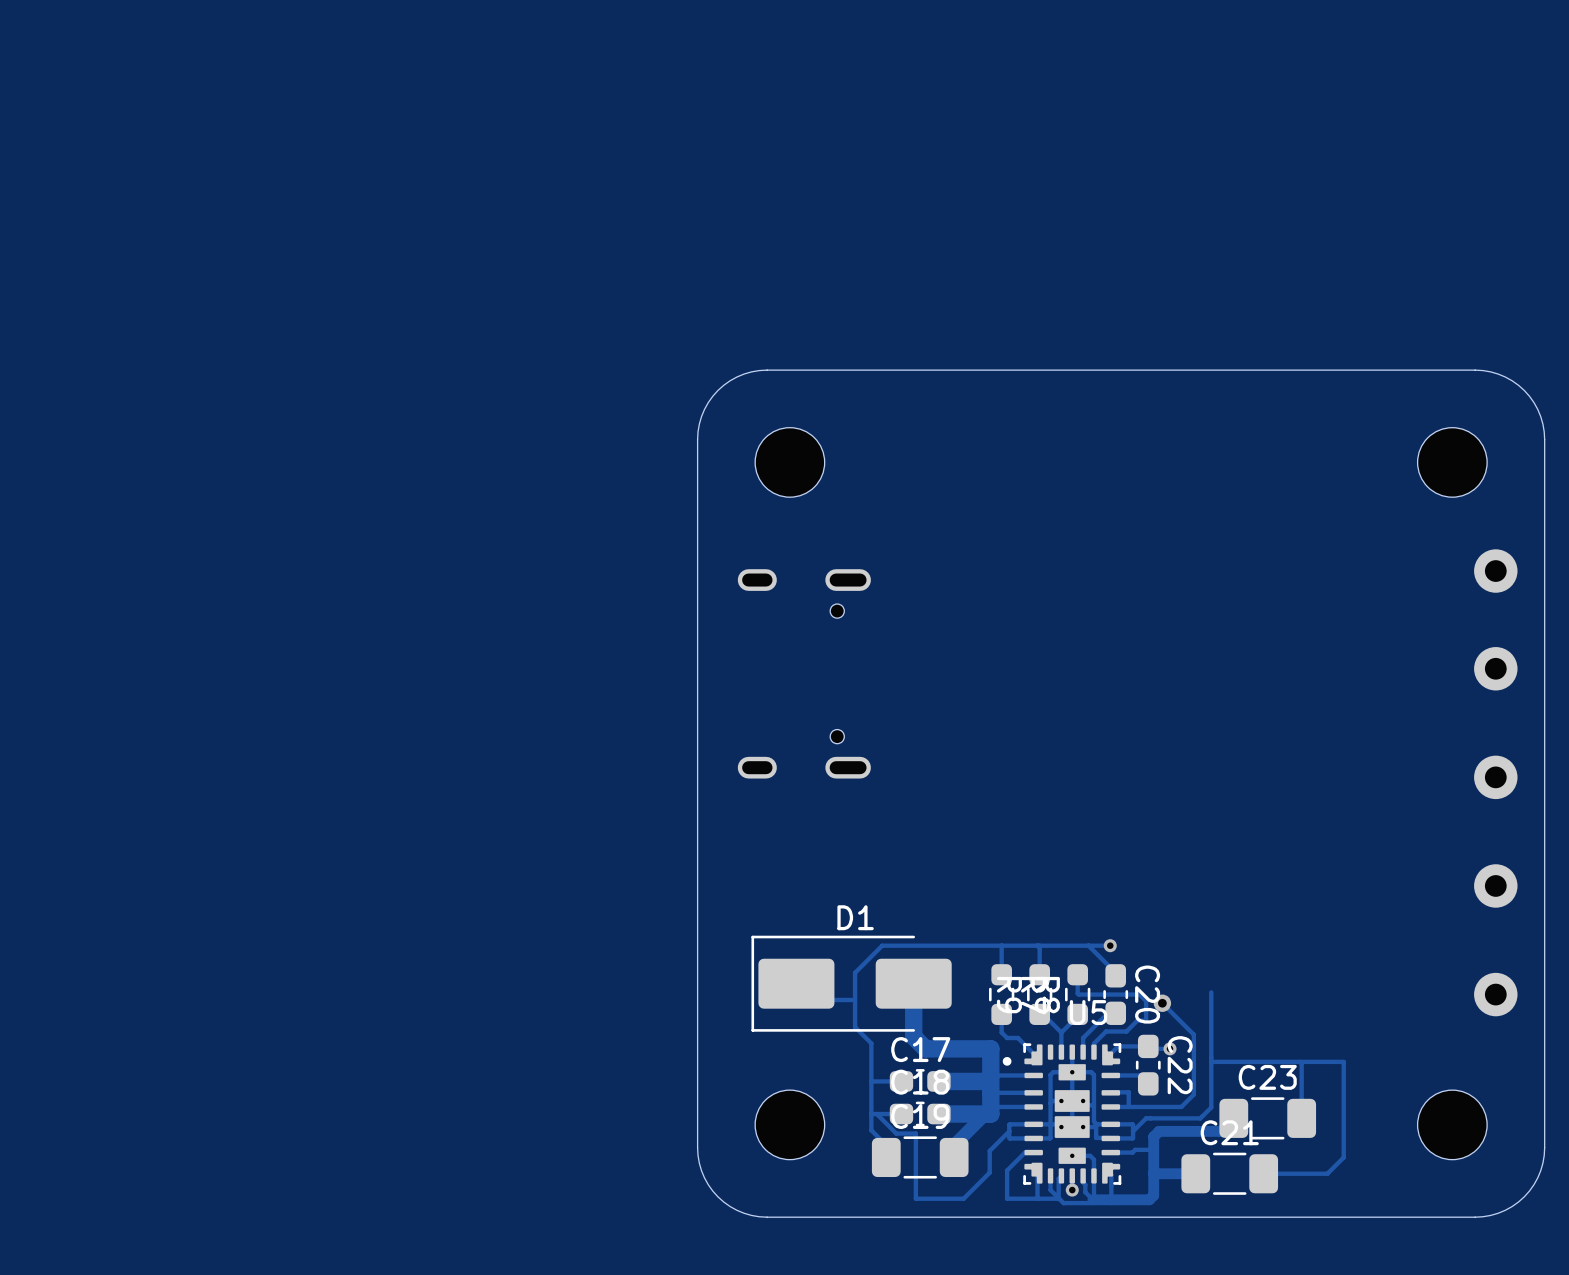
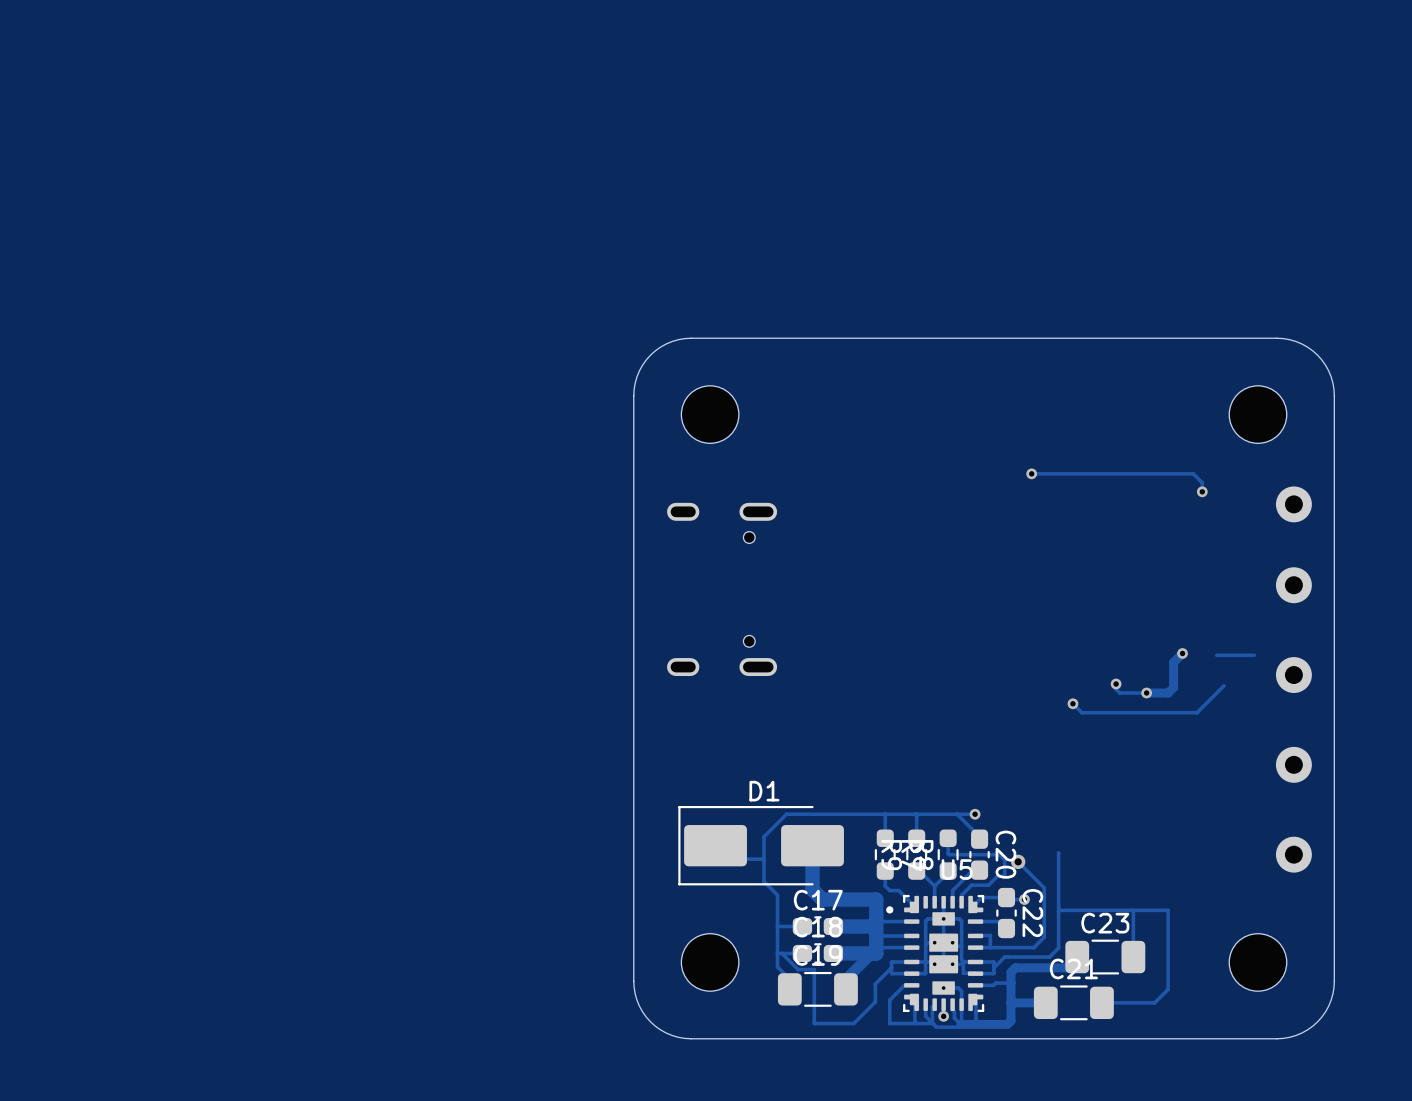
track: none -> (1031, 473) (1193, 473) (1202, 482) (1202, 491)
via: none -> (1031, 473)
via: none -> (1202, 491)
track: none -> (1182, 653) (1173, 662) (1173, 687) (1168, 693) (1119, 693) (1116, 689) (1116, 684)
via: none -> (1182, 653)
track: none -> (1254, 655) (1216, 655)
via: none -> (1116, 684)
track: none -> (1224, 685) (1197, 712) (1081, 712) (1072, 703)
via: none -> (1146, 693)
via: none -> (1072, 703)

